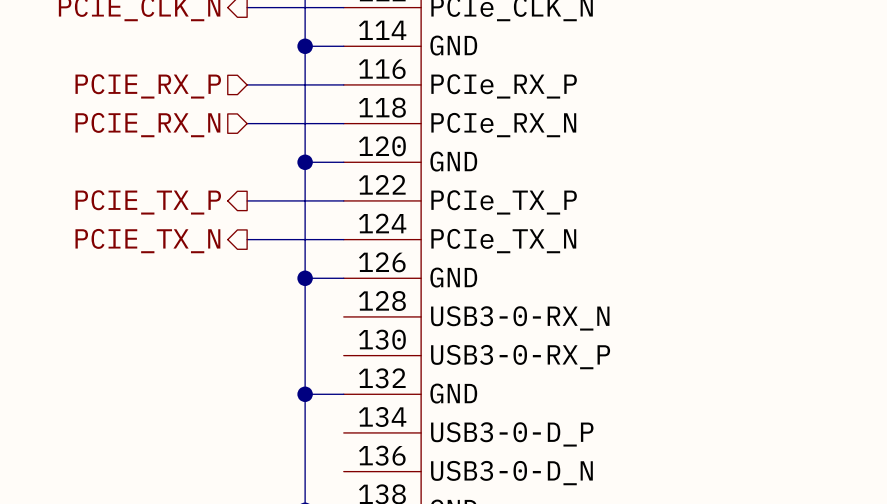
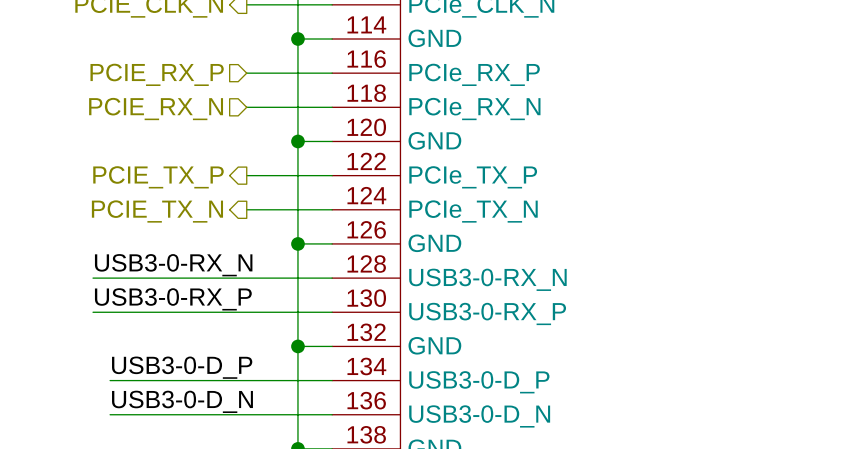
label: none -> USB3-0-RX_N (173, 265)
wire: none -> (93, 278) (332, 278)
label: none -> USB3-0-RX_P (173, 299)
wire: none -> (93, 312) (332, 312)
label: none -> USB3-0-D_P (182, 367)
wire: none -> (110, 380) (332, 380)
label: none -> USB3-0-D_N (182, 401)
wire: none -> (110, 414) (332, 414)

